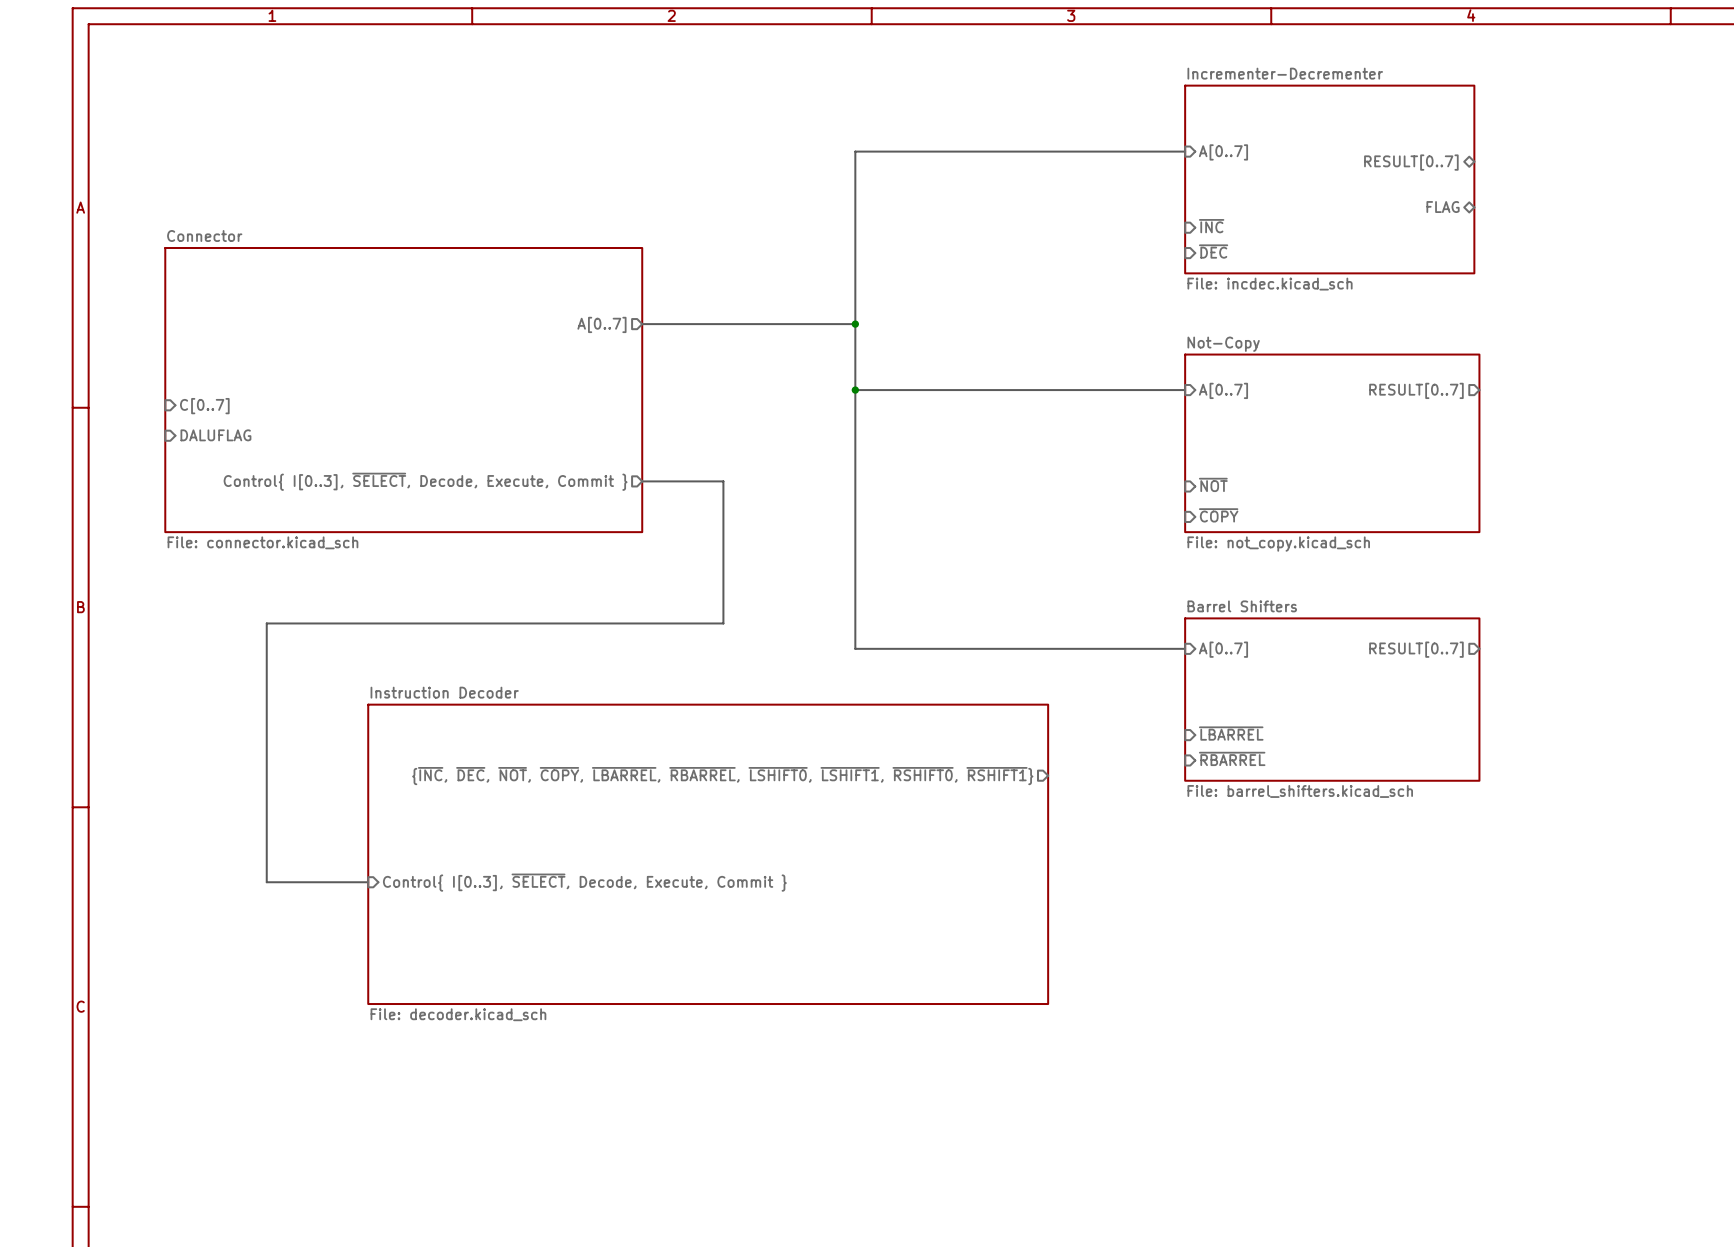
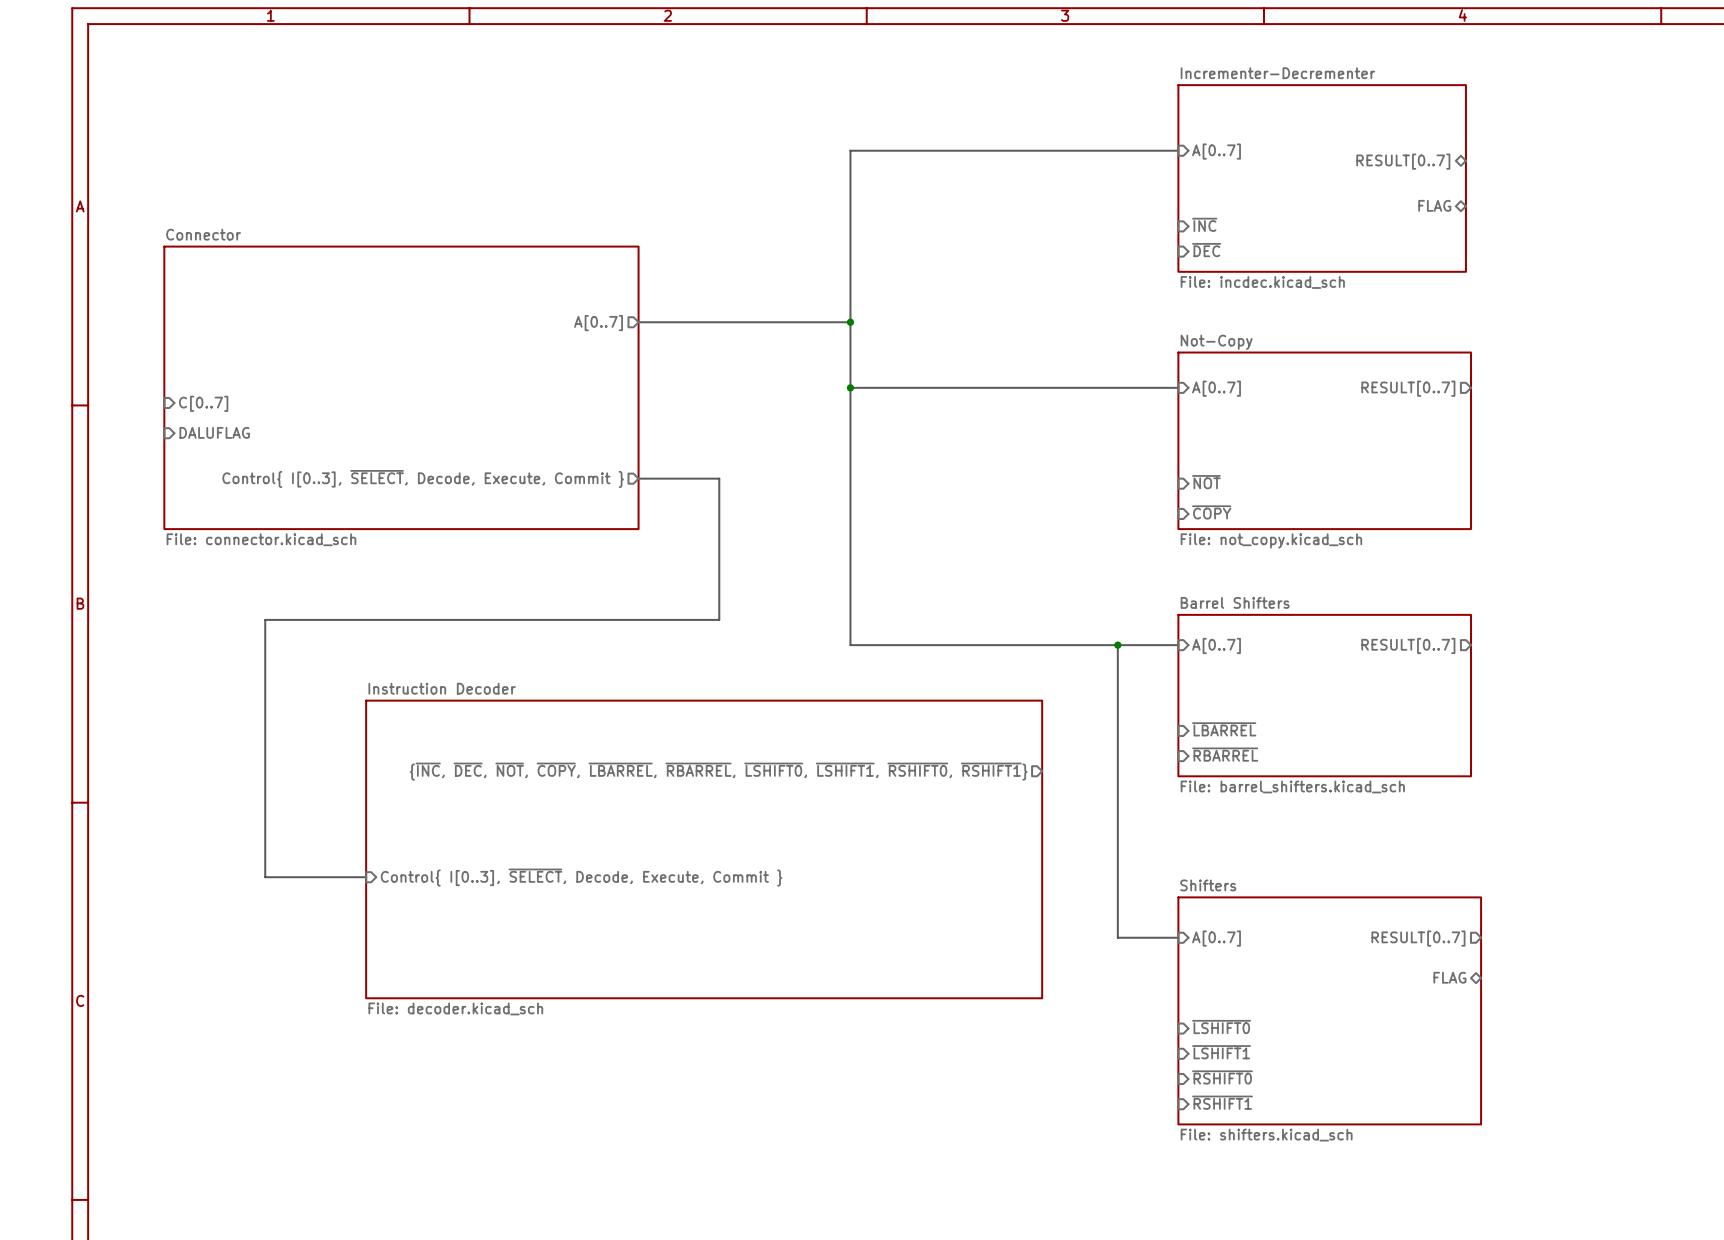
bus: none -> (1117, 645) (1117, 937) (1178, 937)
junction: none -> (1117, 645)
sheet pin: none -> A[0..7] (1216, 938)
sheet pin: none -> RESULT[0..7] (1418, 938)
sheet pin: none -> FLAG (1449, 977)
sheet Shifters: none -> File: shifters.kicad_sch (1329, 1010)
sheet pin: none -> ~{LSHIFT0} (1221, 1027)
sheet pin: none -> ~{LSHIFT1} (1221, 1052)
sheet pin: none -> ~{RSHIFT0} (1222, 1077)
sheet pin: none -> ~{RSHIFT1} (1222, 1102)

